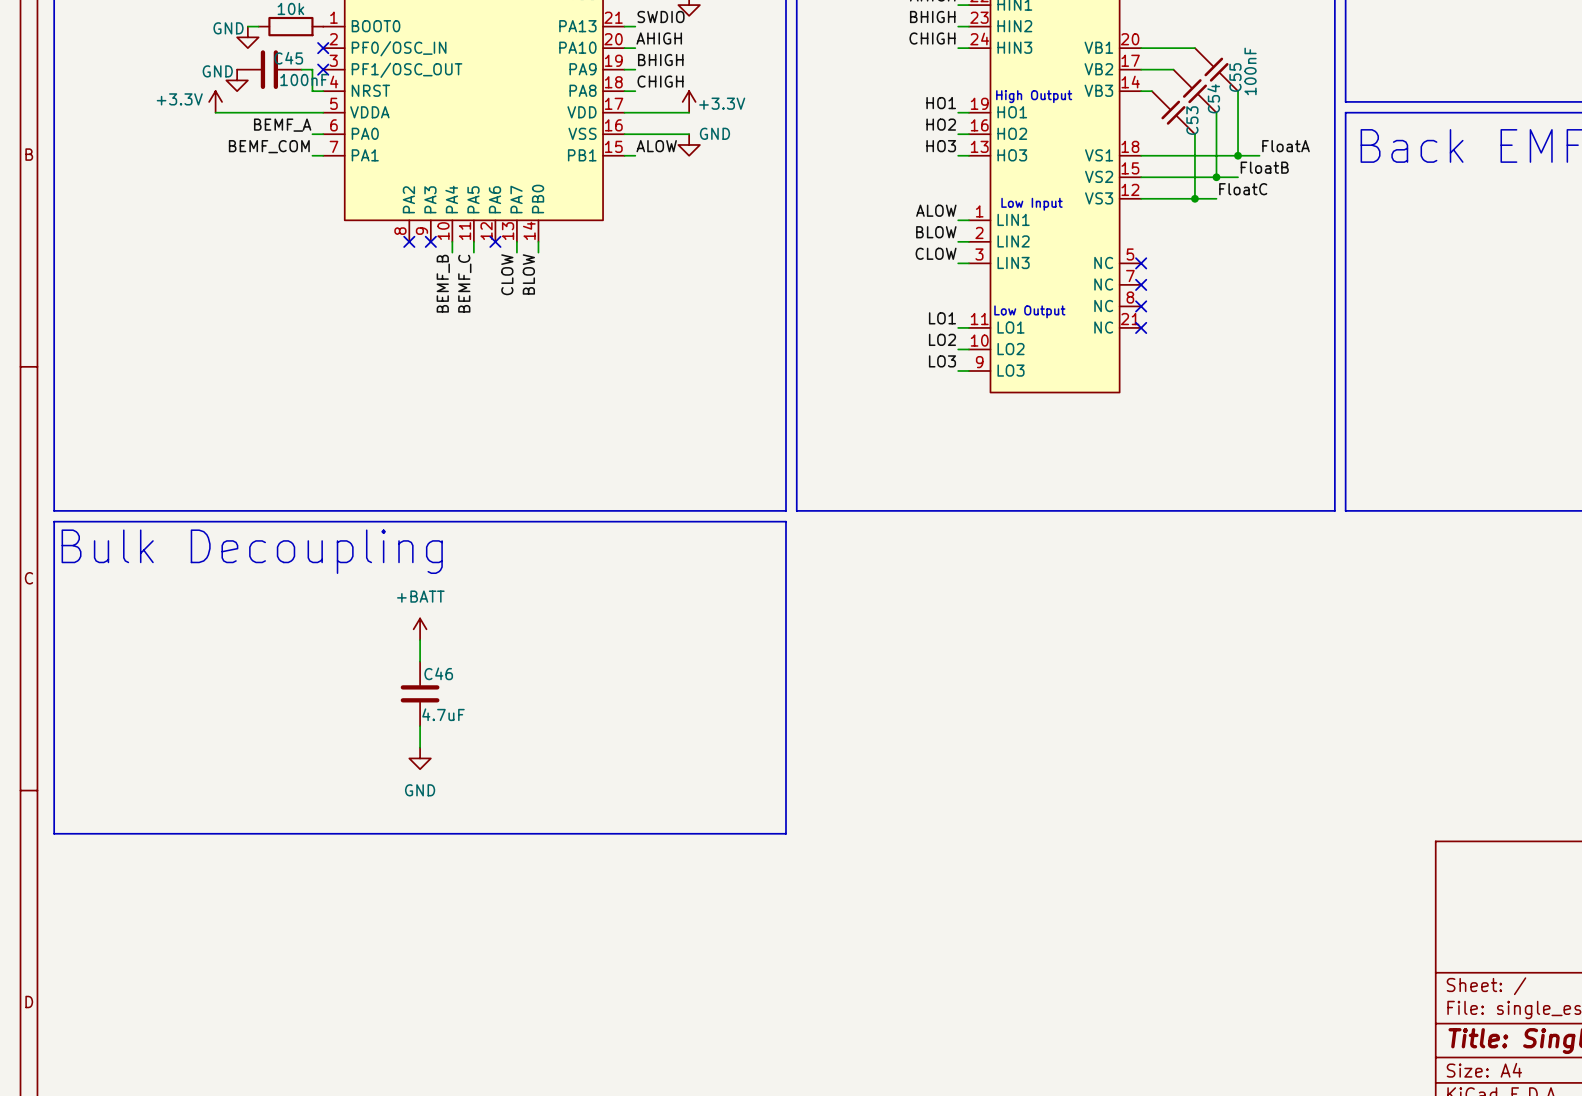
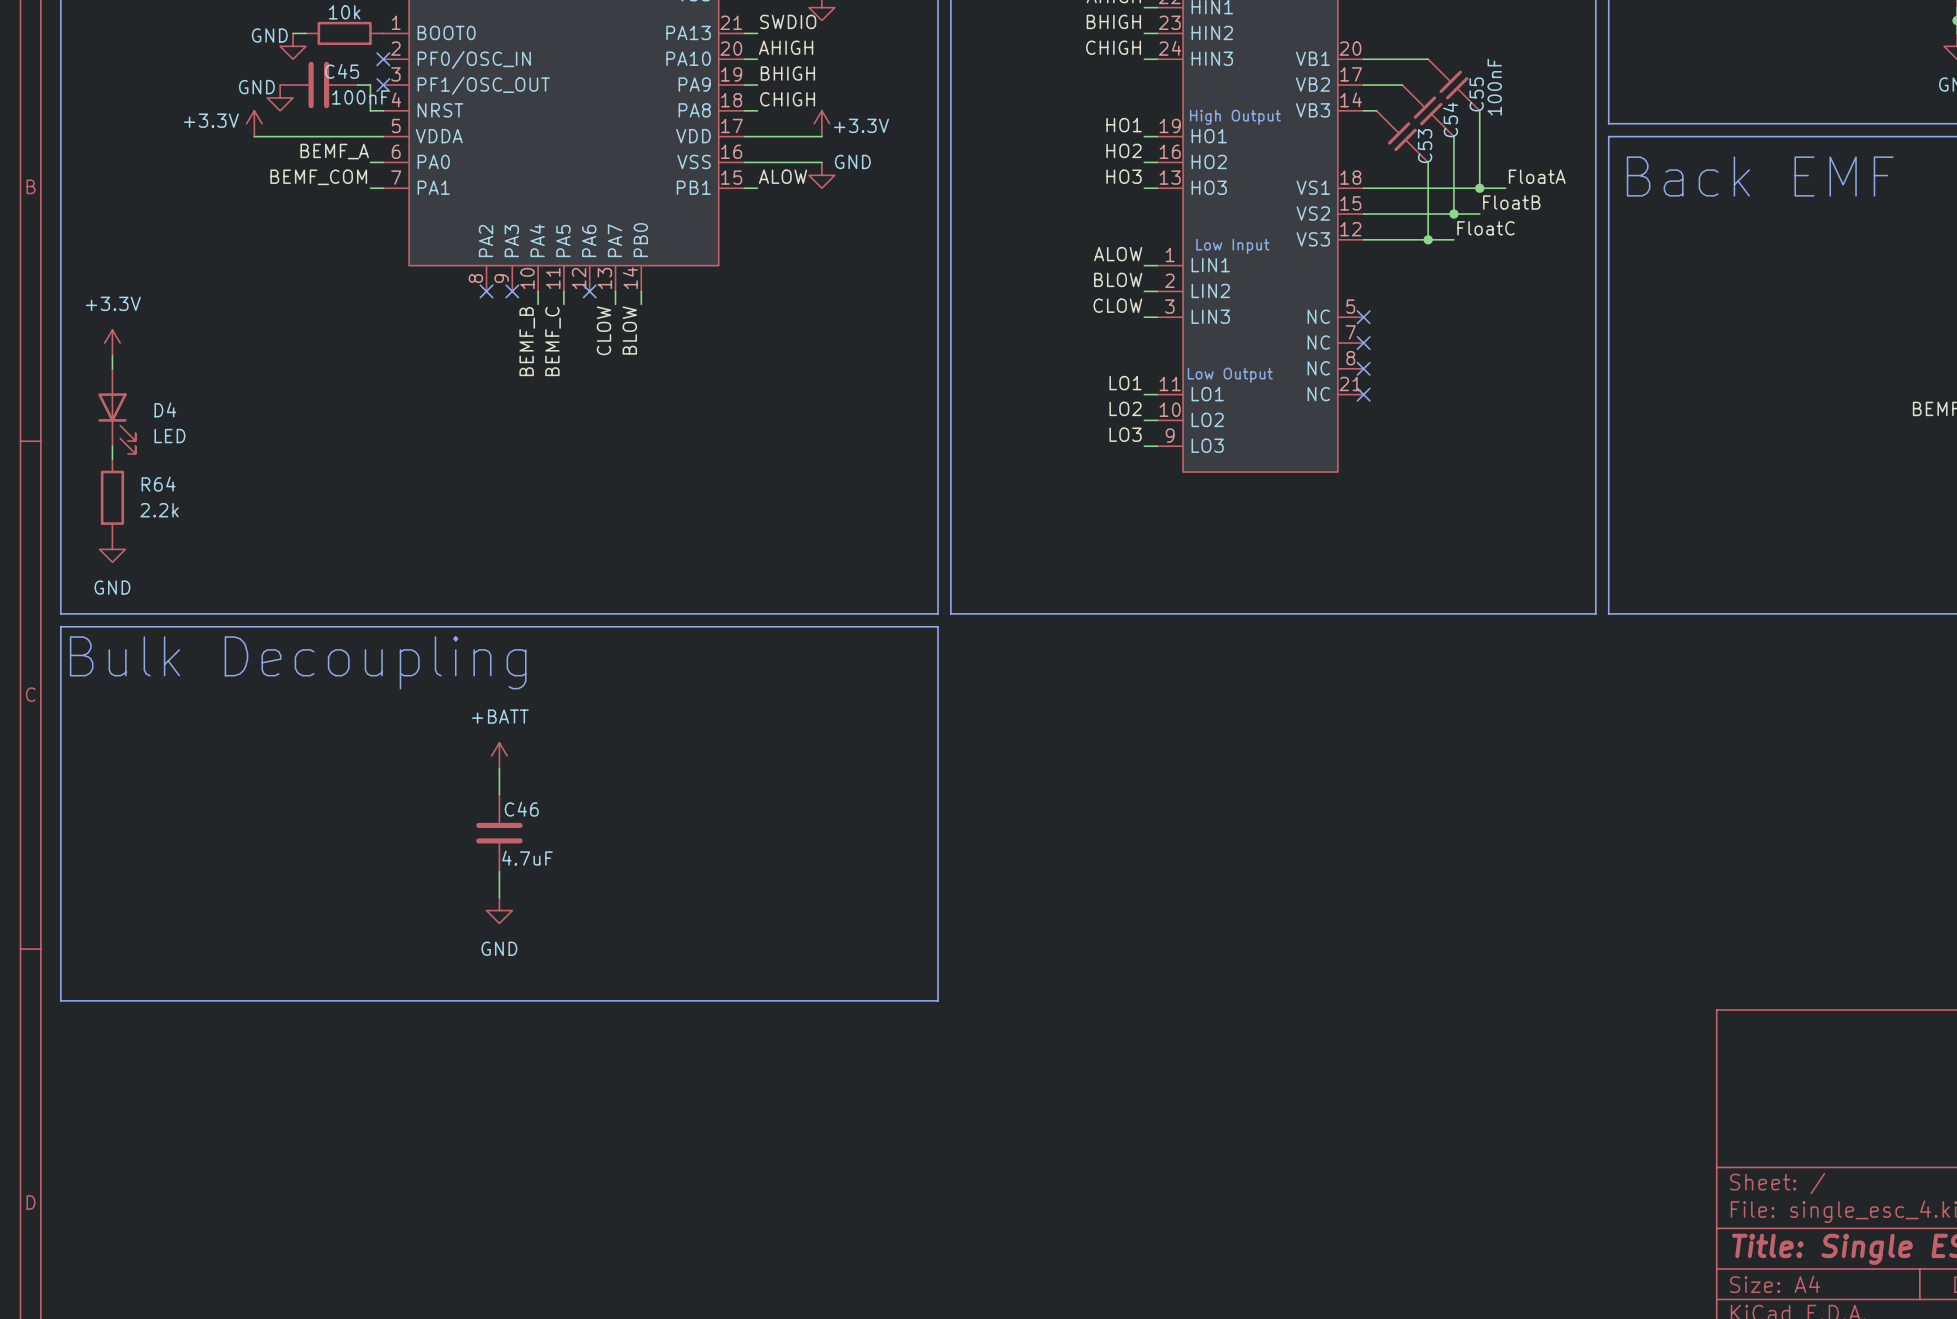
power symbol: none -> +3.3V (112, 343)
wire: none -> (112, 355) (112, 368)
D4: none -> LED (116, 411)
wire: none -> (112, 446) (112, 459)
R64: none -> 2.2k (112, 497)
power symbol: none -> GND (112, 549)

